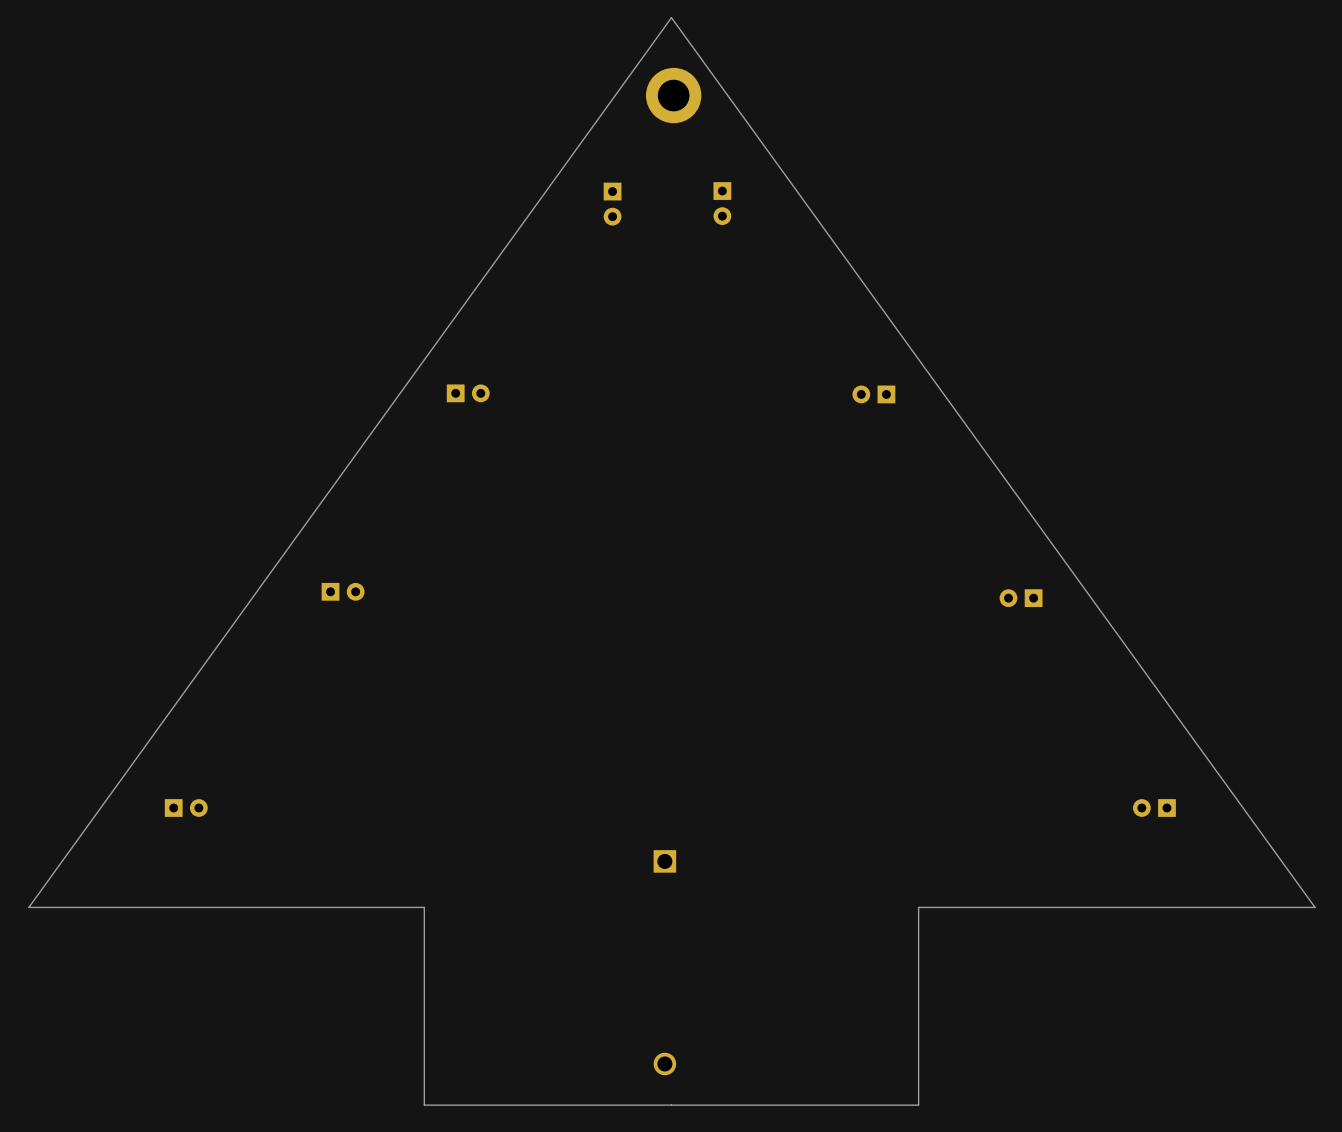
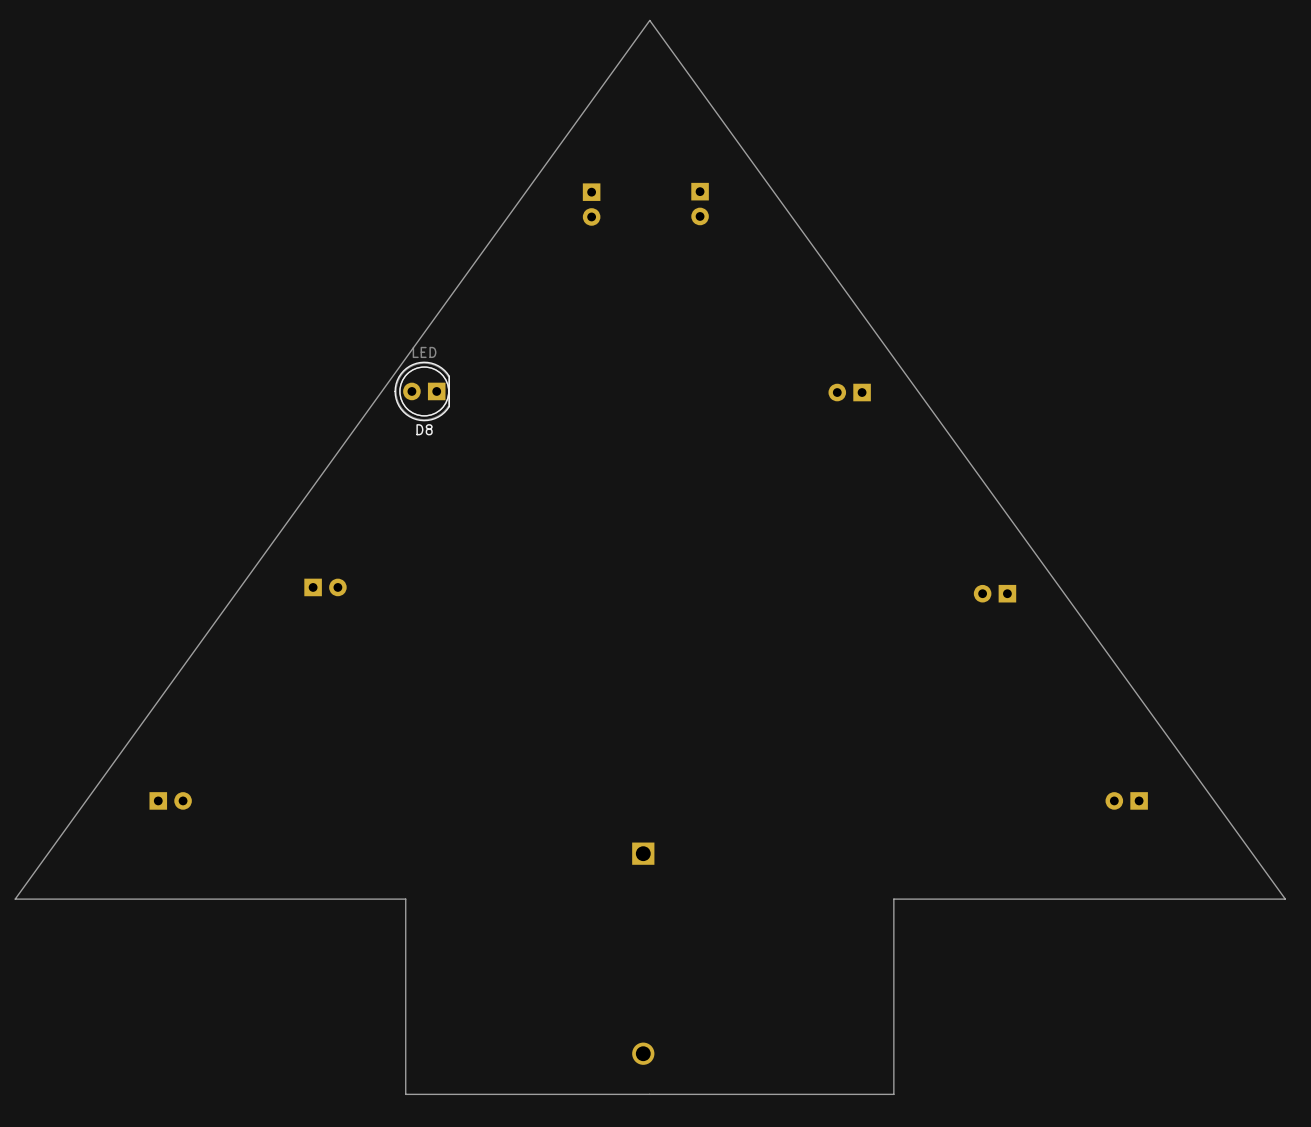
part: (673, 95) -> none
D8 side: top (468, 393) -> bottom (422, 391)

